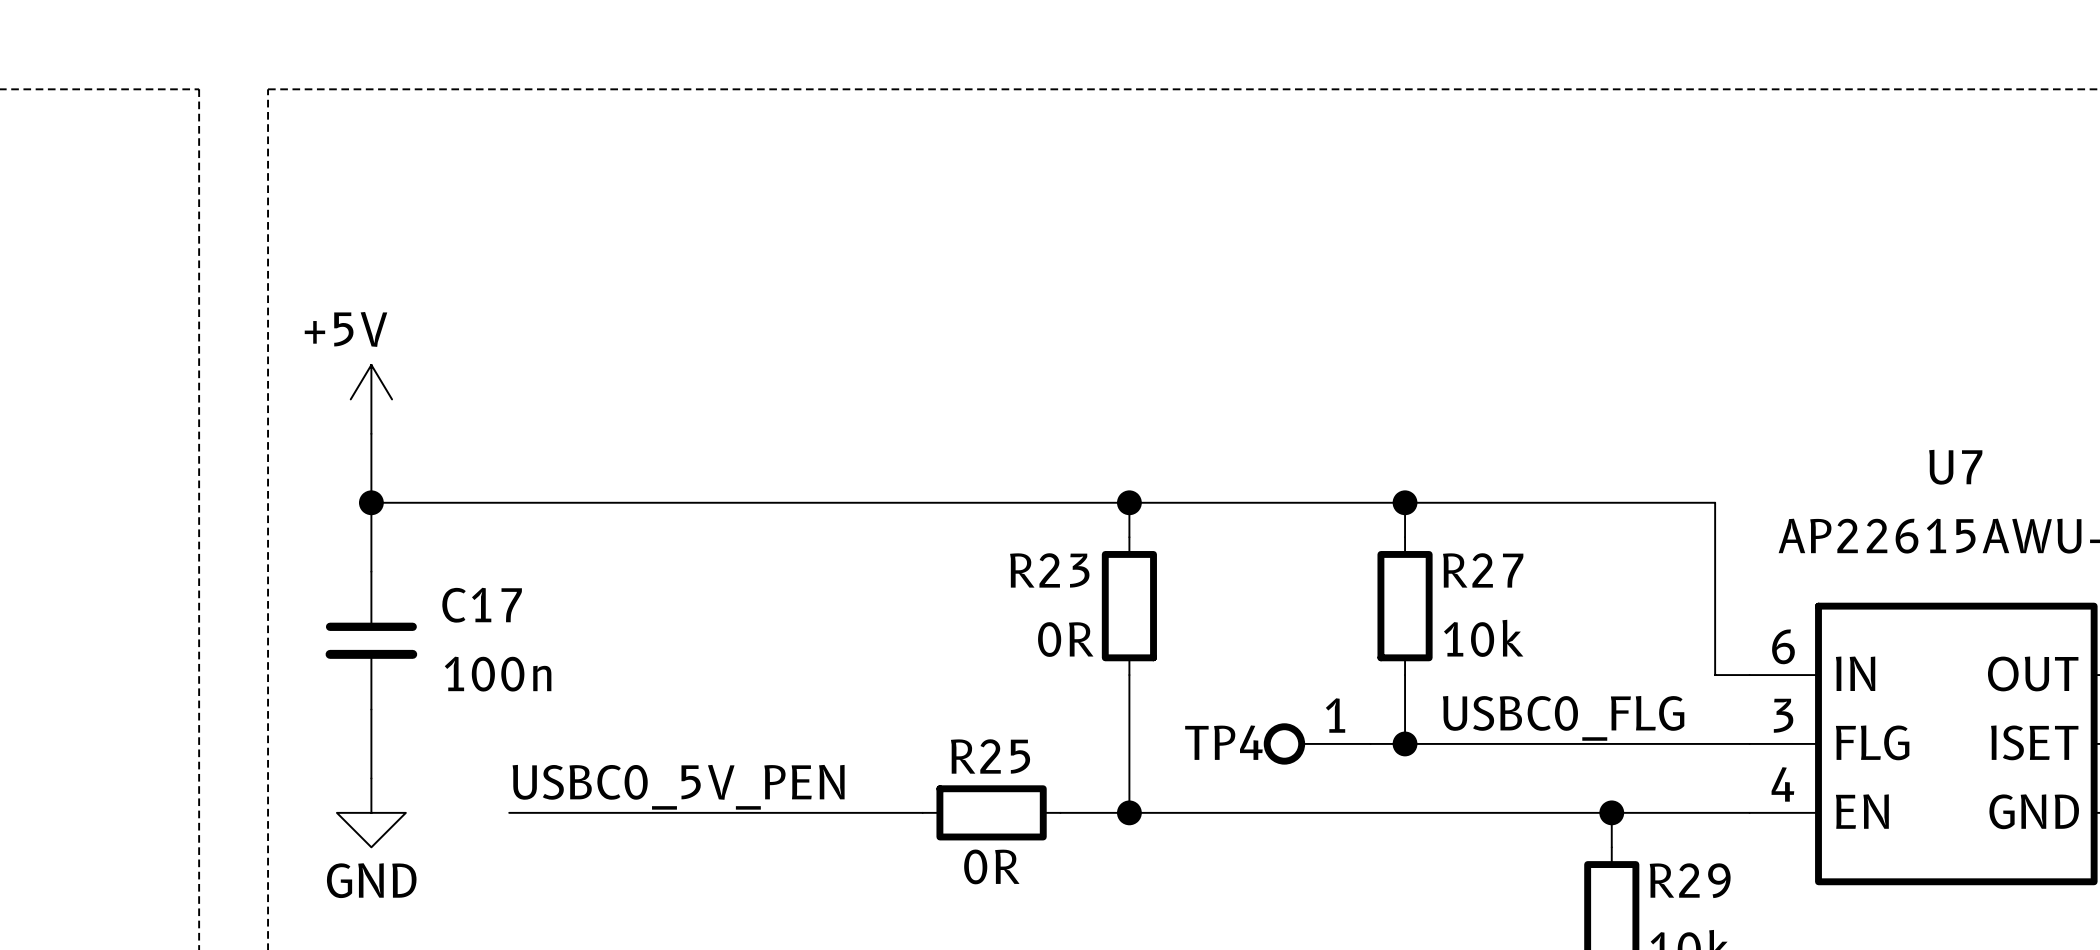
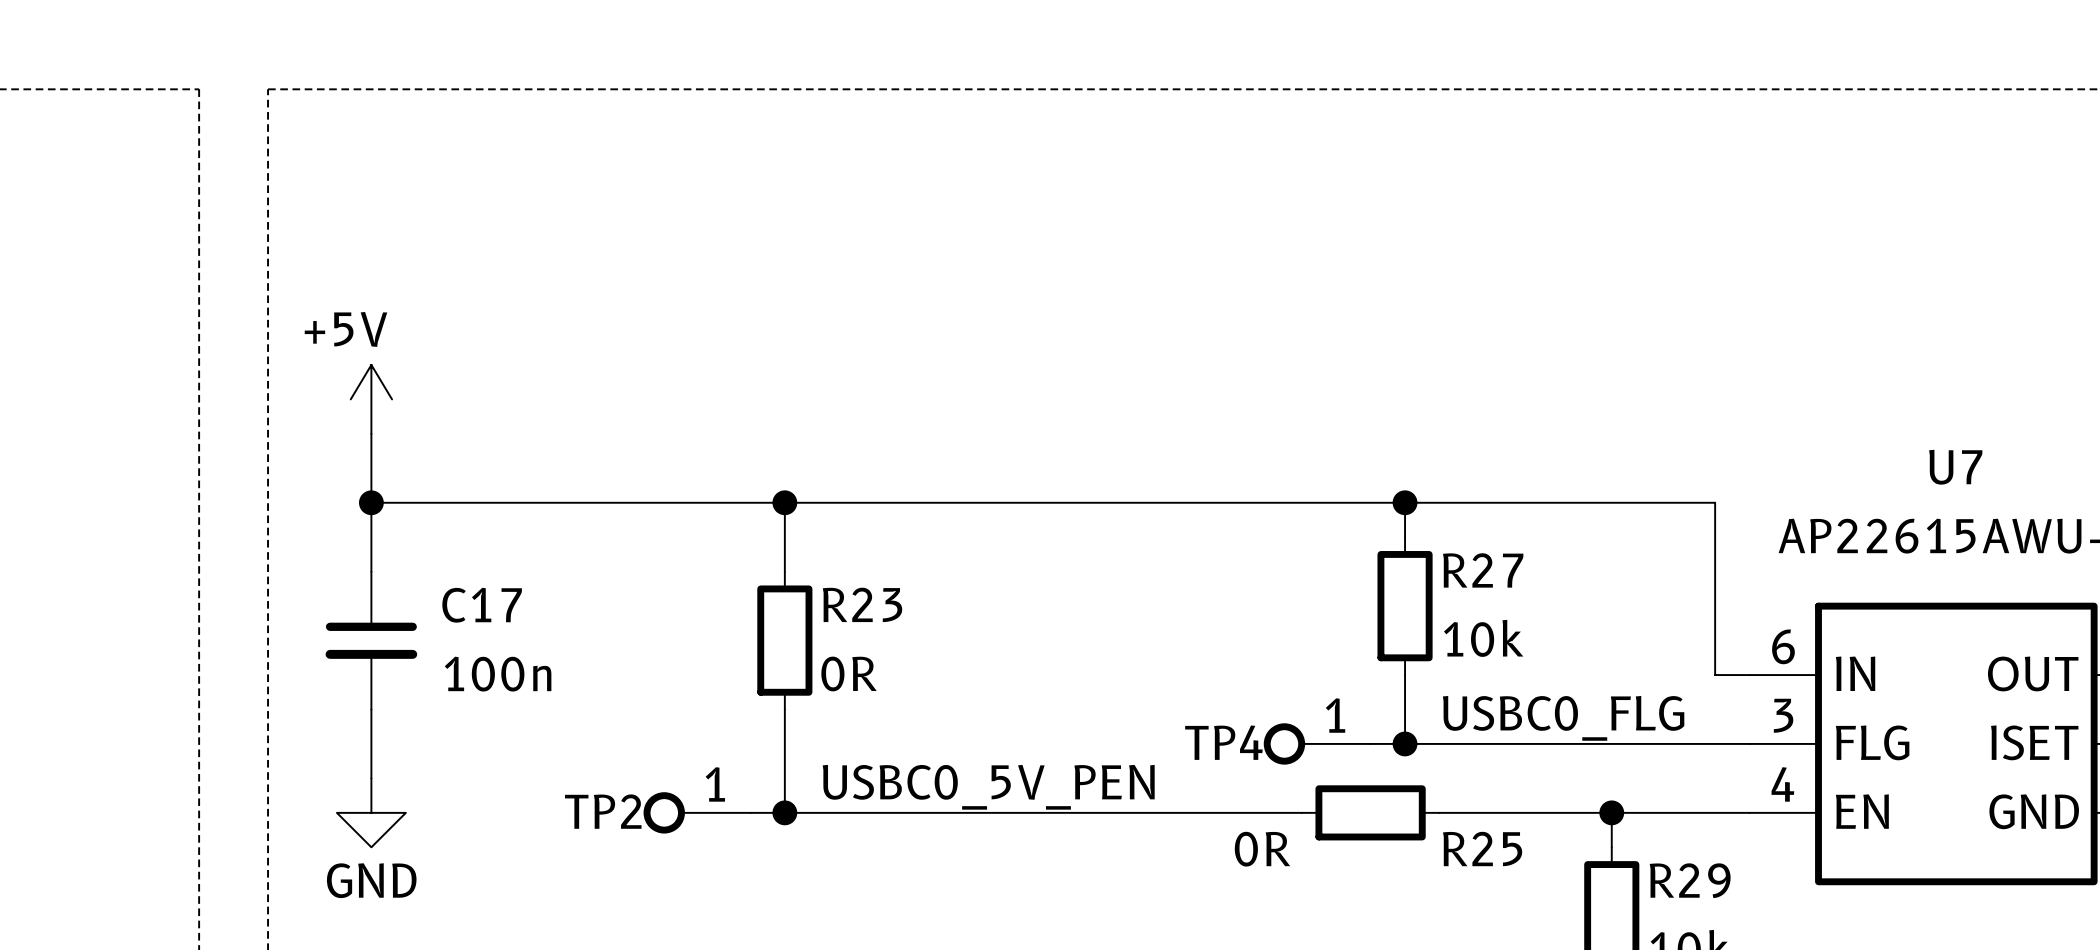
wire: none -> (784, 502) (784, 571)
junction: none -> (784, 502)
wire: (1129, 502) (1129, 537) -> none
junction: (1129, 502) -> none
R23 name position: R23 (1049, 570) -> R23 (862, 604)
R23 position: (1129, 606) -> (784, 640)
R23 text position: 0R (1065, 639) -> 0R (849, 673)
wire: (1129, 675) (1129, 812) -> none
wire: none -> (784, 709) (784, 812)
R25 name position: R25 (990, 756) -> R25 (1482, 849)
label position: USBC0_5V_PEN (678, 787) -> USBC0_5V_PEN (988, 787)
wire: (509, 812) (750, 812) -> none
TP2: none -> (696, 812)
junction: none -> (784, 812)
R25 position: (991, 812) -> (1370, 812)
junction: (1129, 812) -> none
wire: (1301, 812) (1439, 812) -> (922, 812) (1060, 812)
R25 text position: 0R (991, 866) -> 0R (1262, 849)

